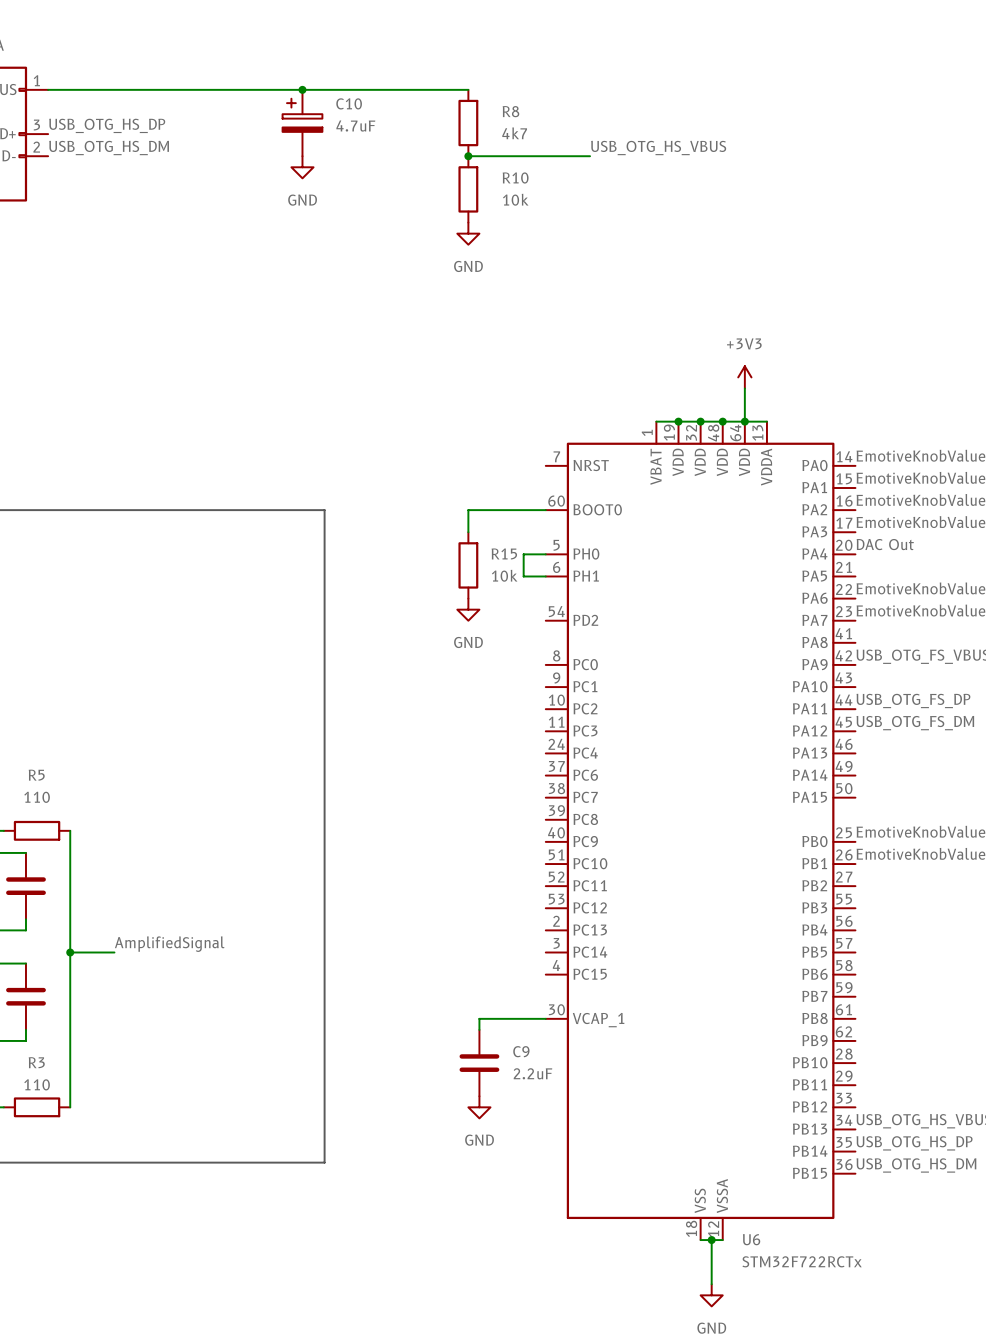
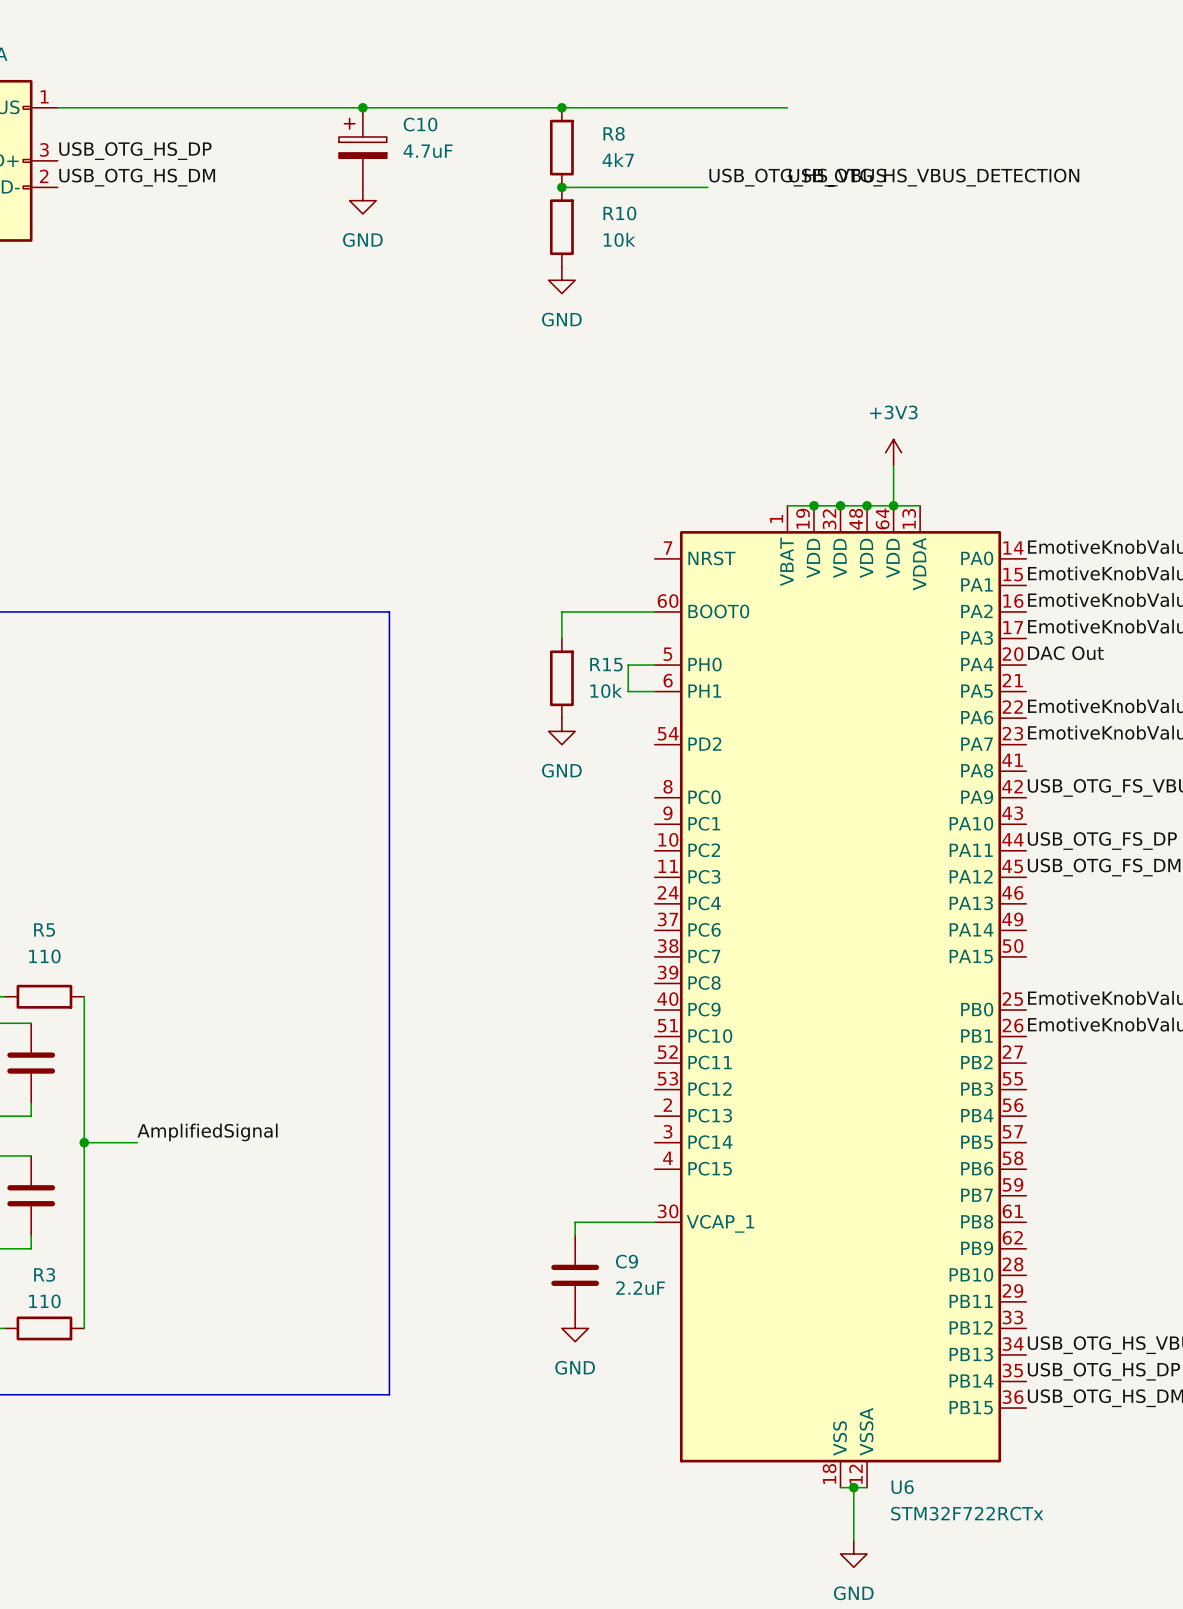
wire: none -> (561, 107) (787, 107)
junction: none -> (561, 107)
label: none -> USB_OTG_HS_VBUS_DETECTION (934, 177)

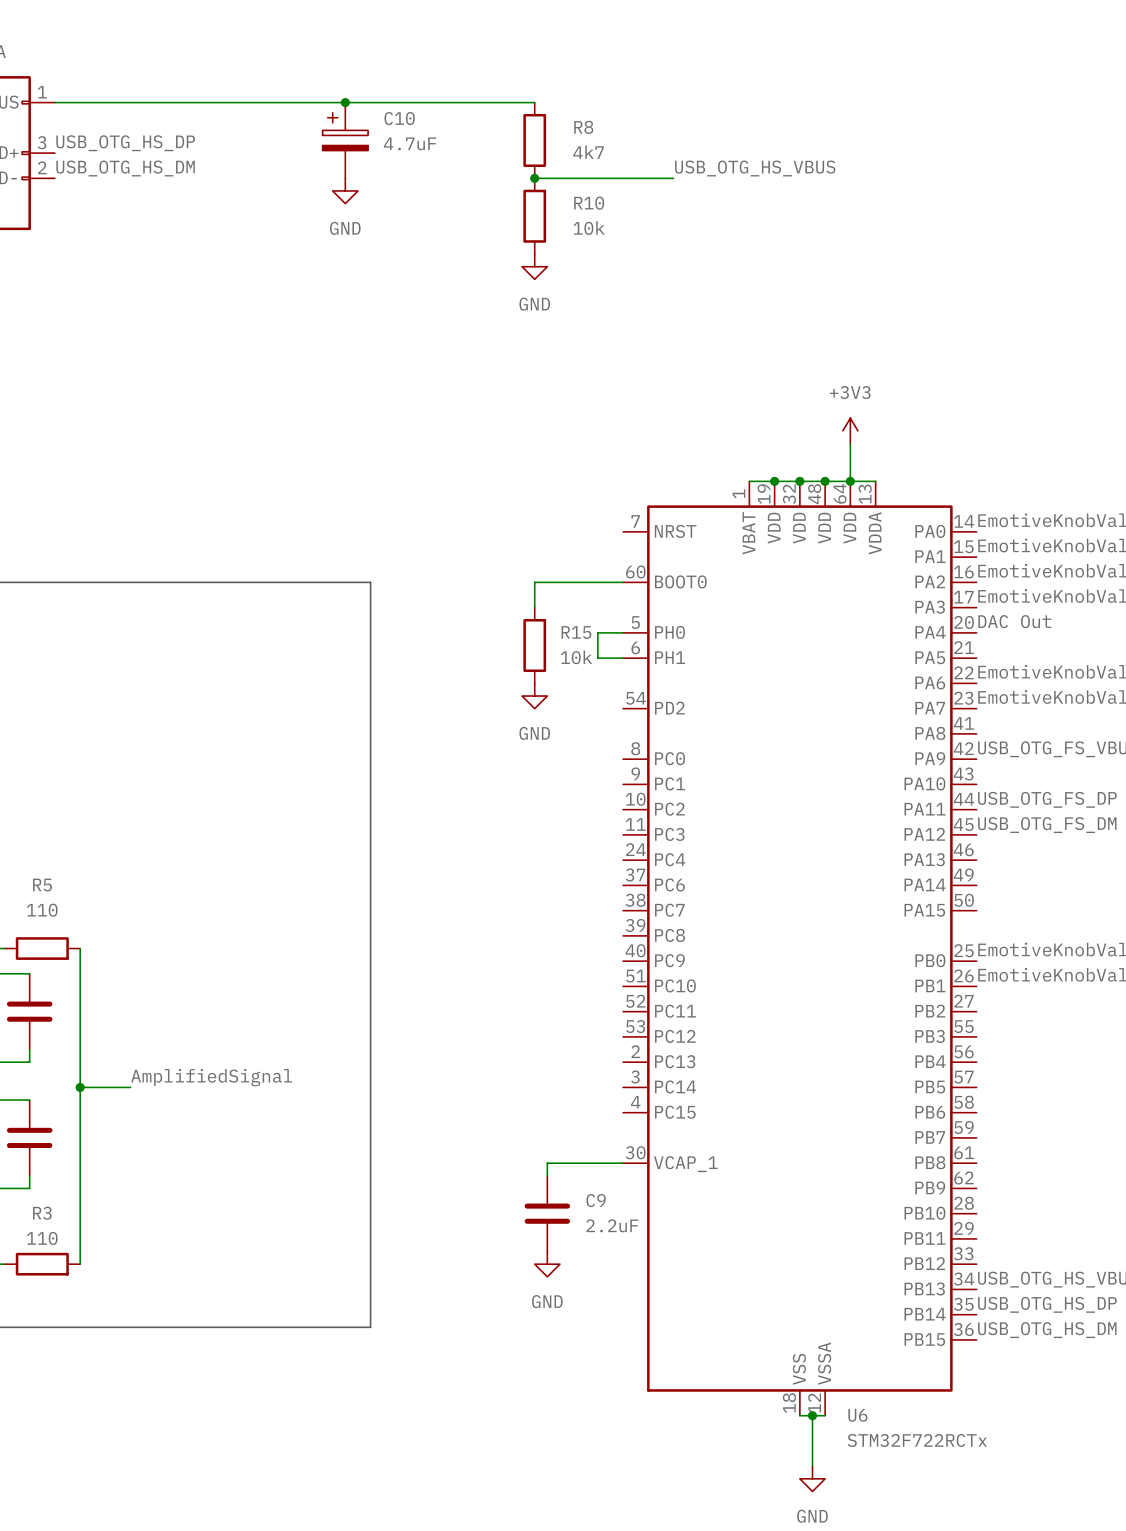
wire: (561, 107) (787, 107) -> none
junction: (561, 107) -> none
label: USB_OTG_HS_VBUS_DETECTION (934, 177) -> none

